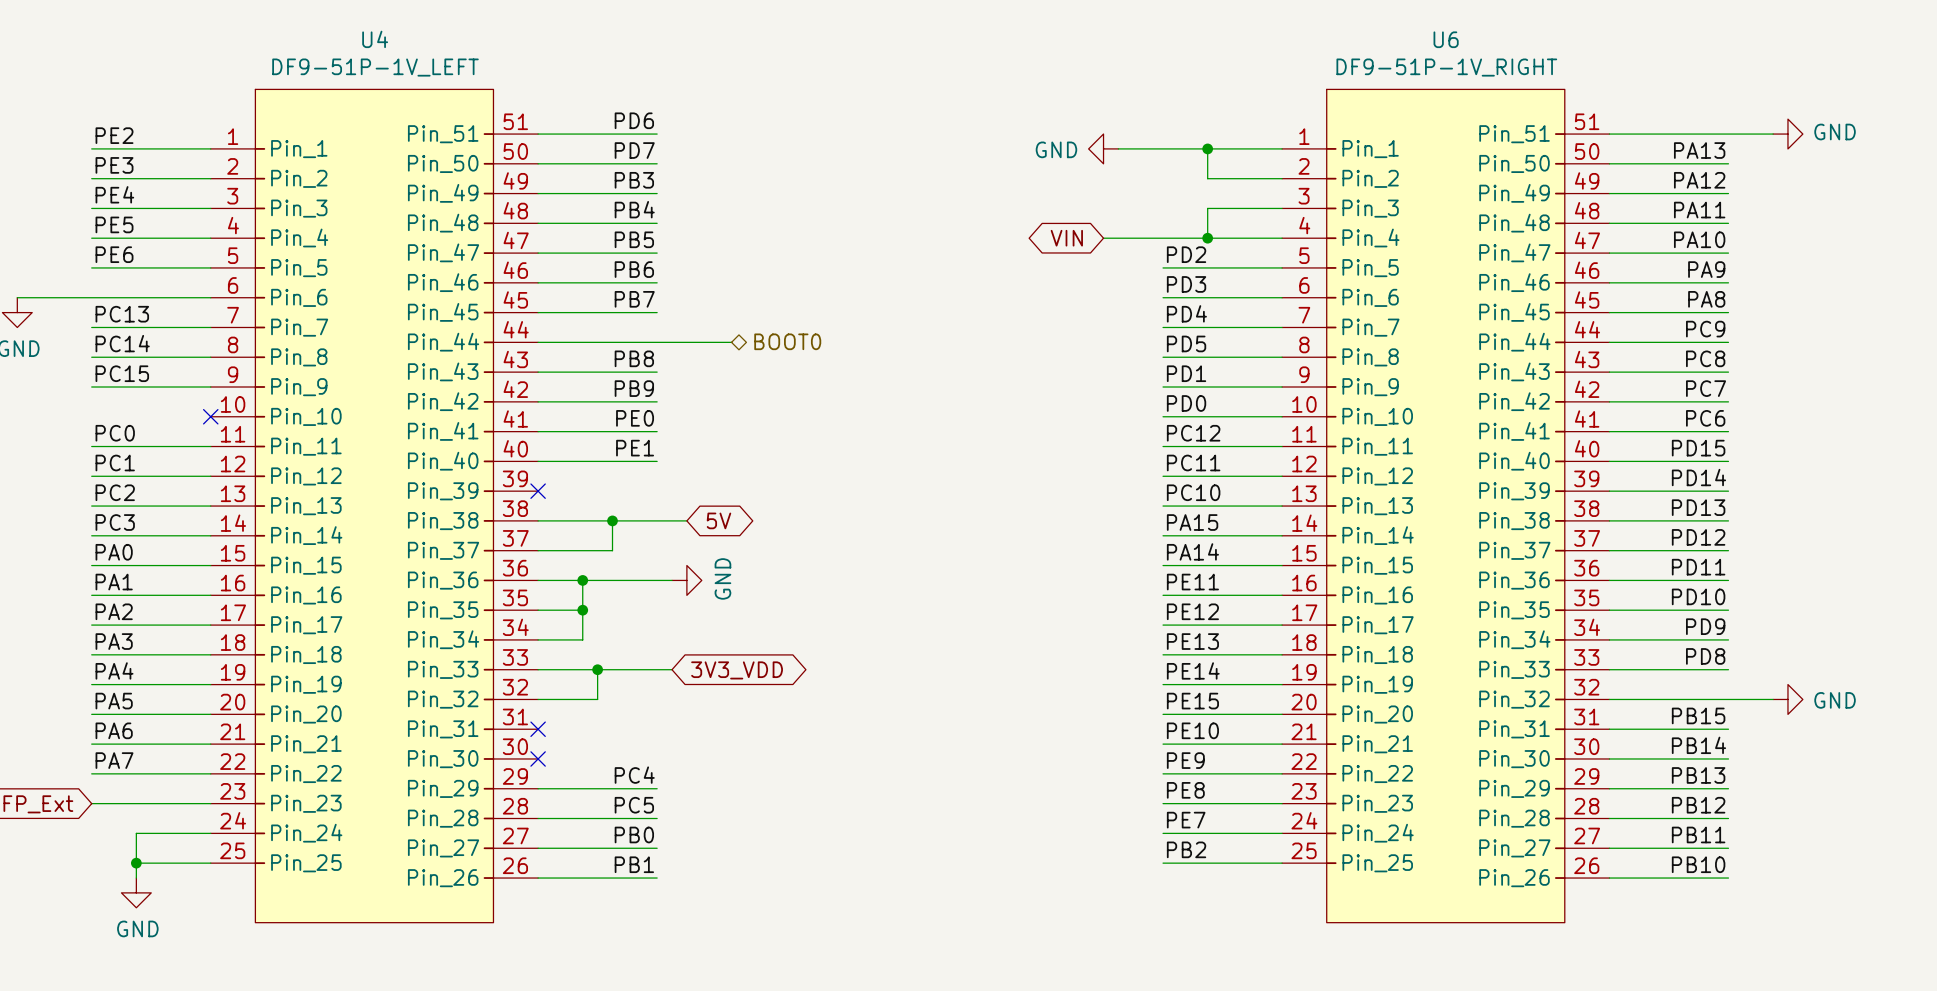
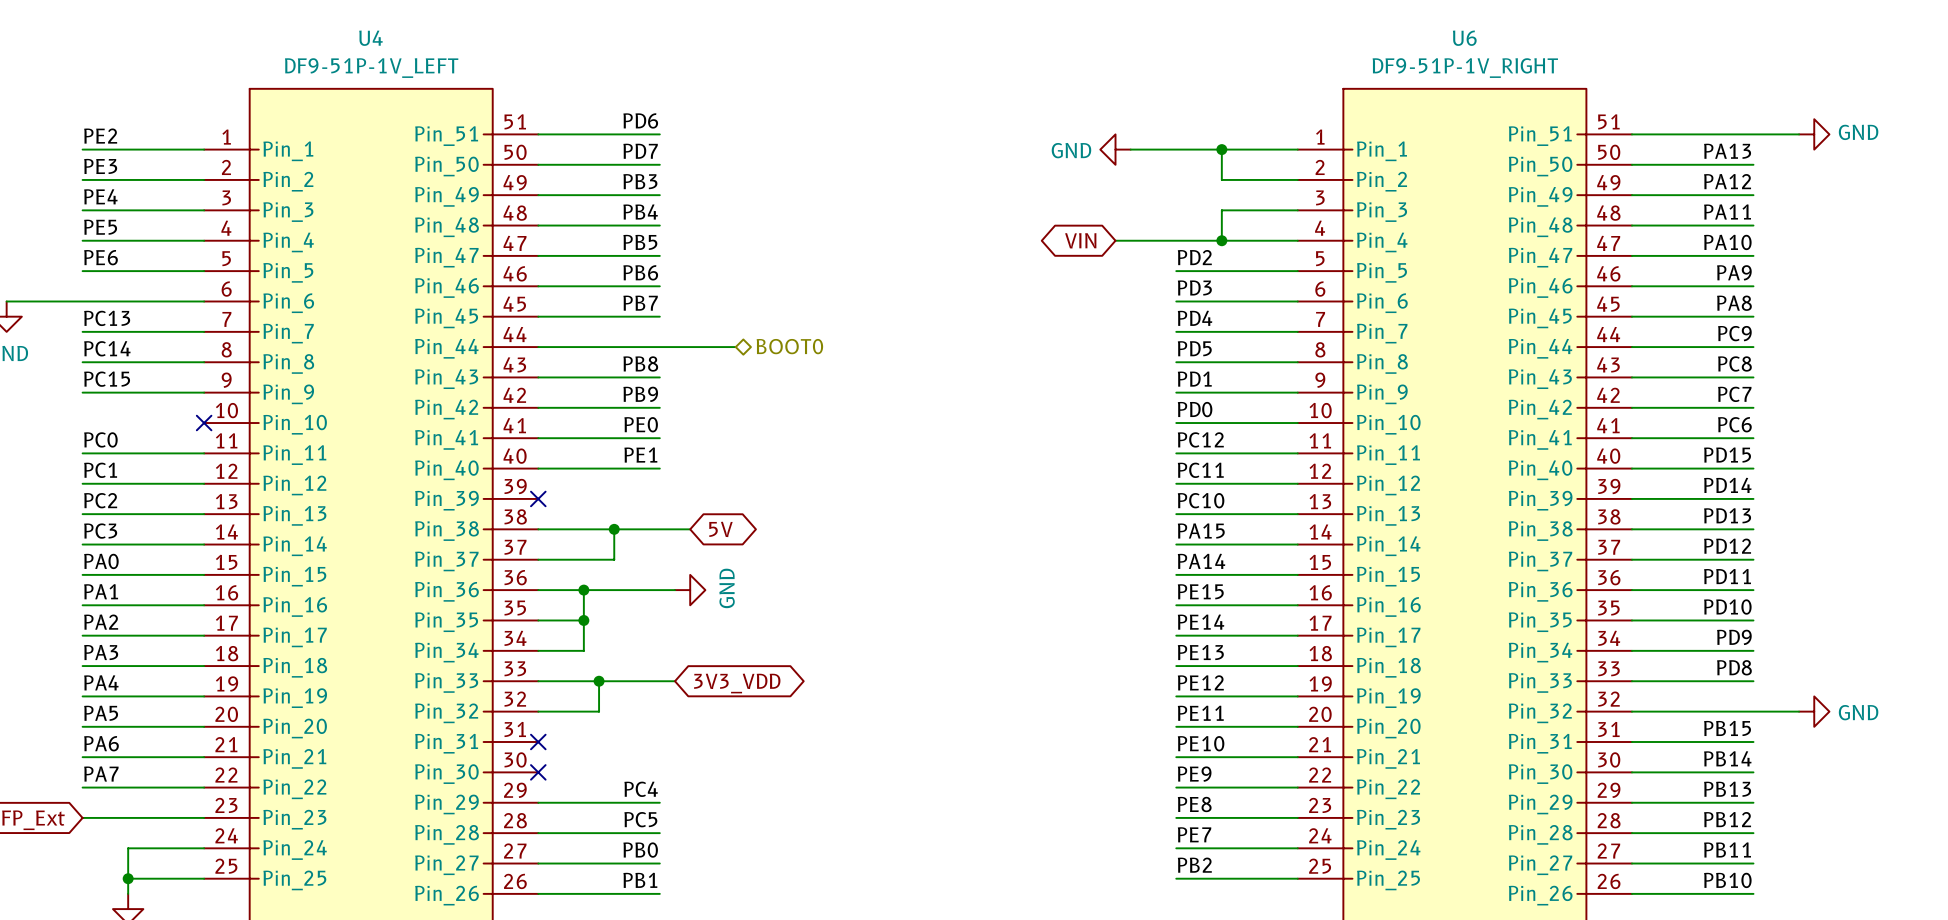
label: PE11 (1192, 582) -> PE15 (1200, 591)
label: PE12 (1192, 611) -> PE14 (1201, 622)
label: PE14 (1193, 670) -> PE12 (1200, 682)
label: PE15 (1192, 701) -> PE11 (1200, 713)

